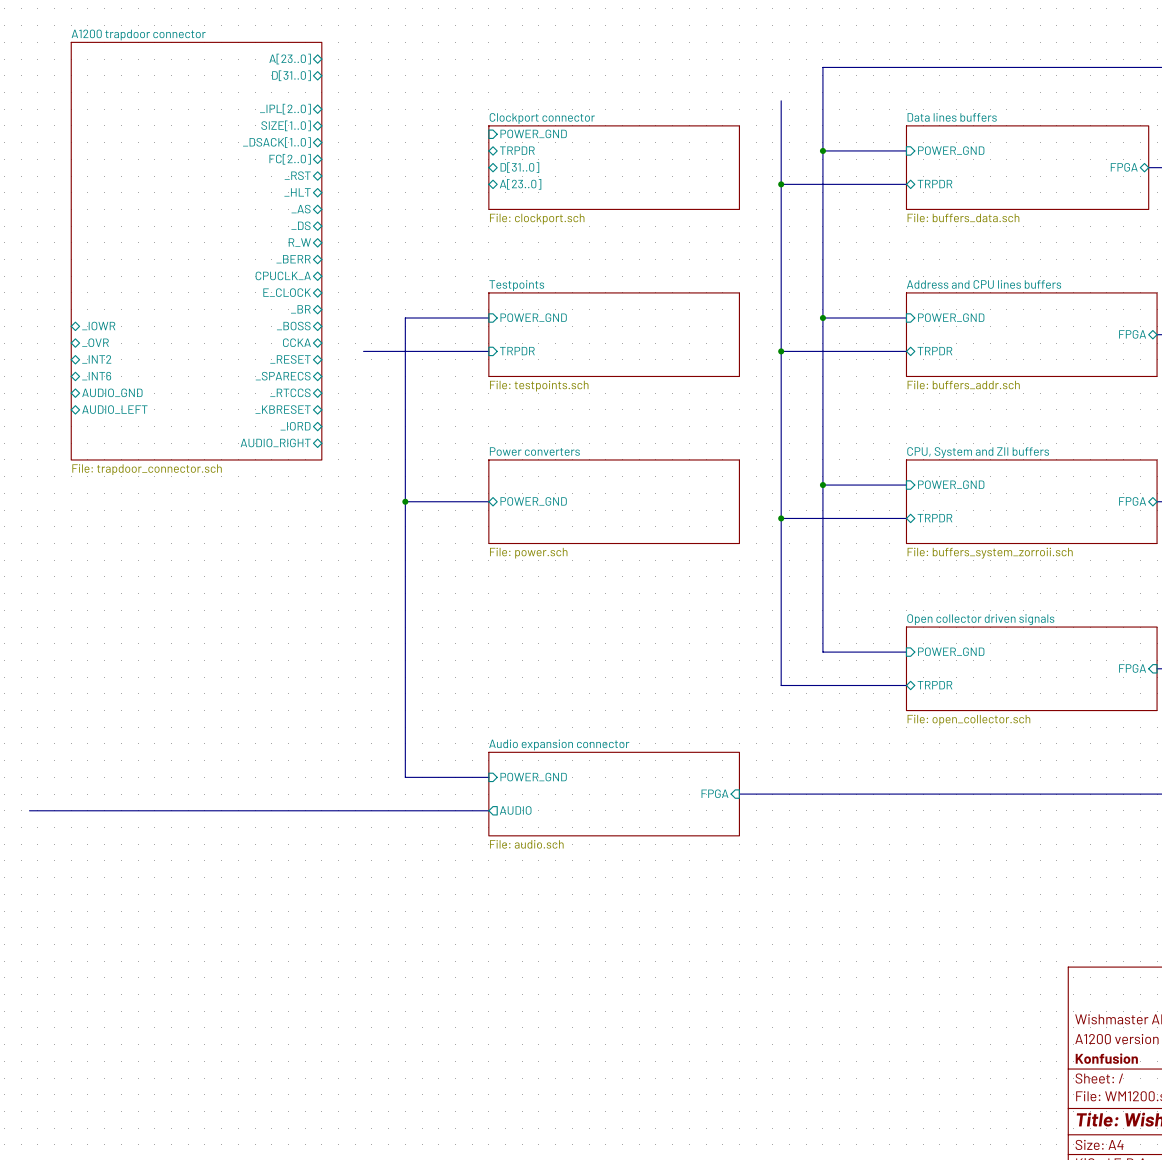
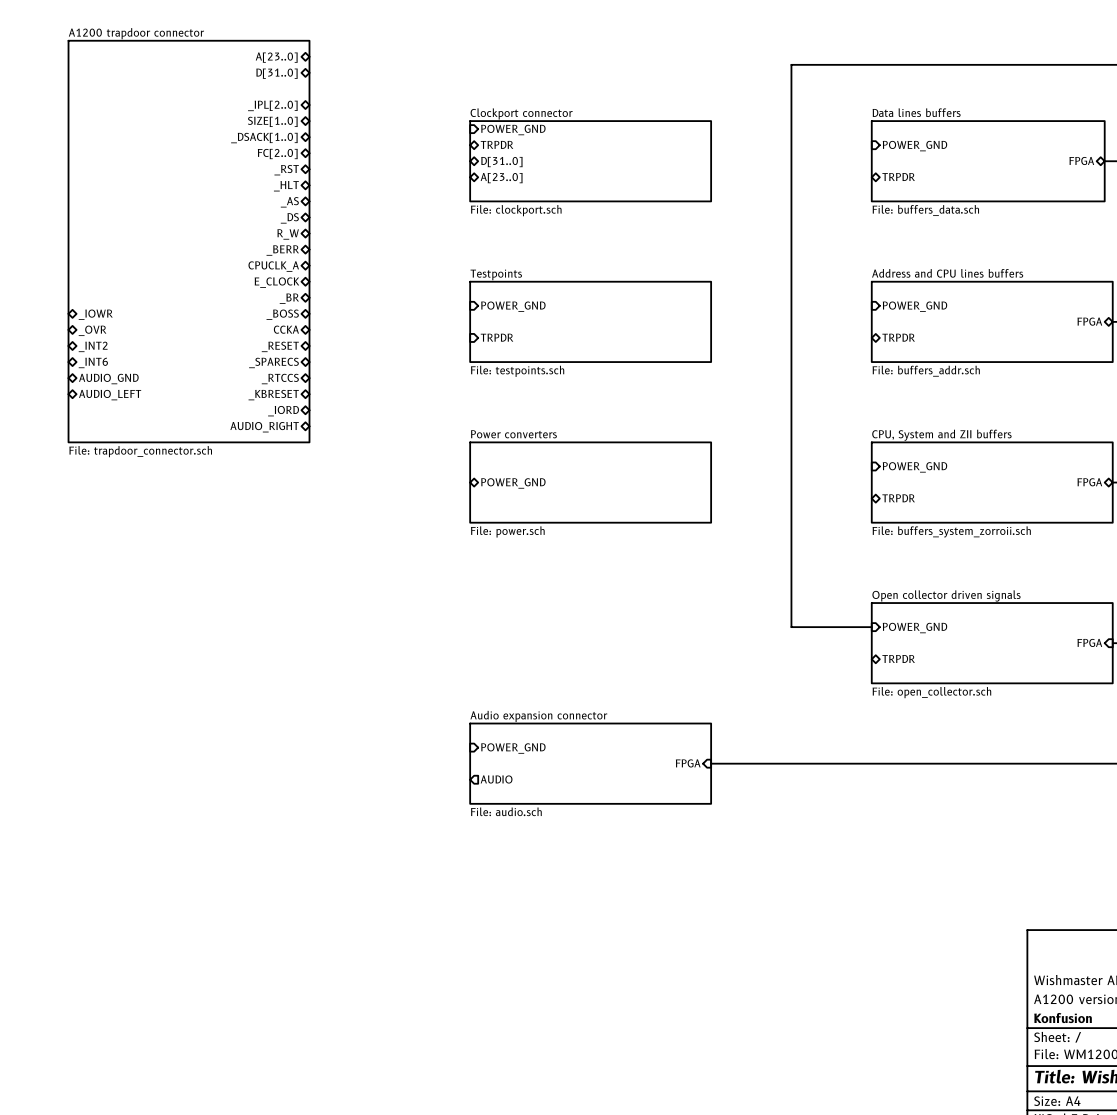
bus: (781, 100) (781, 685) (906, 685) -> none
bus: (822, 150) (906, 150) -> none
junction: (822, 150) -> none
bus: (781, 184) (906, 184) -> none
junction: (781, 184) -> none
bus: (488, 318) (405, 318) (405, 777) (488, 777) -> none
bus: (822, 318) (906, 318) -> none
junction: (822, 318) -> none
bus: (363, 351) (488, 351) -> none
bus: (781, 351) (906, 351) -> none
junction: (781, 351) -> none
bus: (822, 485) (906, 485) -> none
junction: (822, 485) -> none
bus: (405, 501) (488, 501) -> none
junction: (405, 501) -> none
bus: (781, 518) (906, 518) -> none
junction: (781, 518) -> none
bus: (29, 810) (488, 810) -> none

